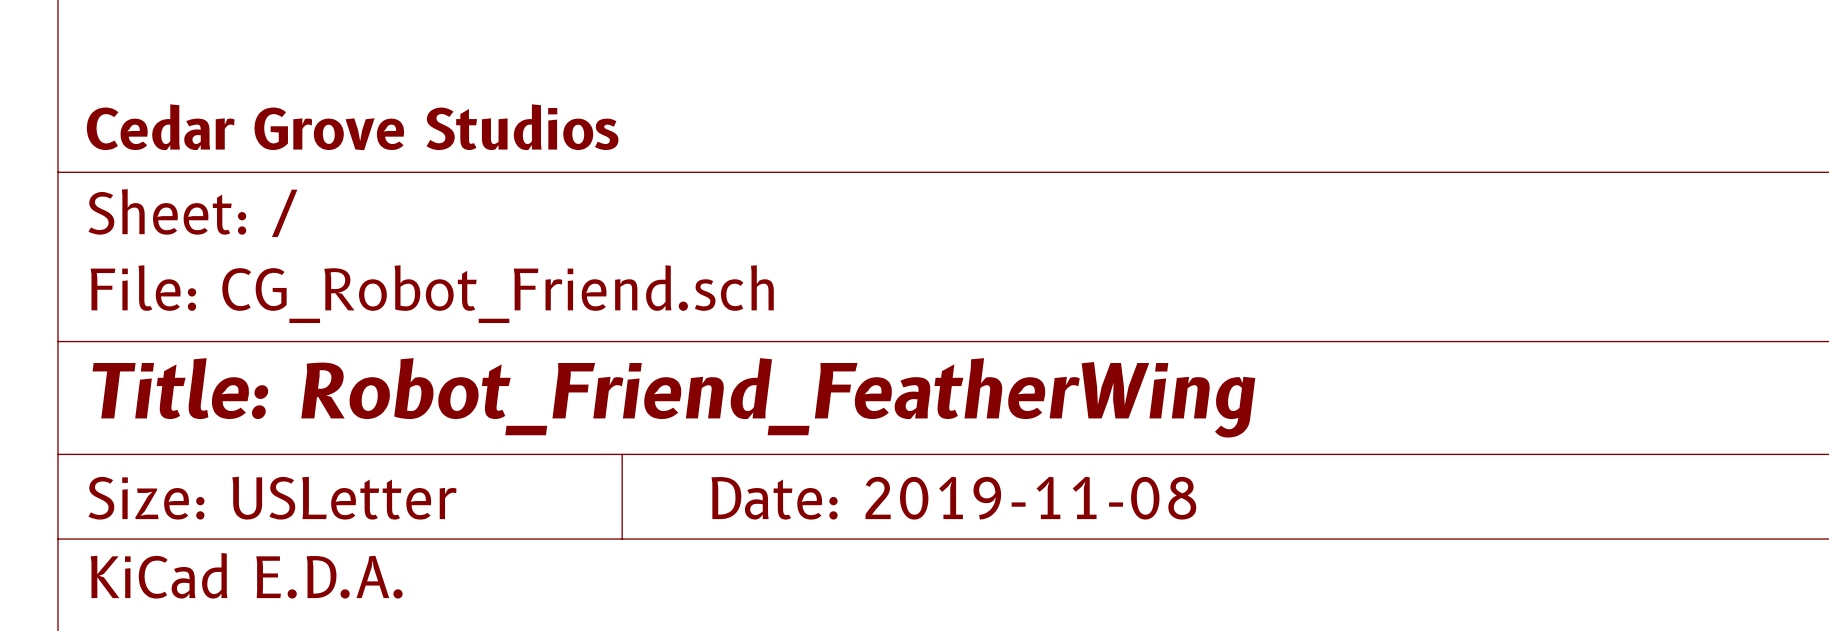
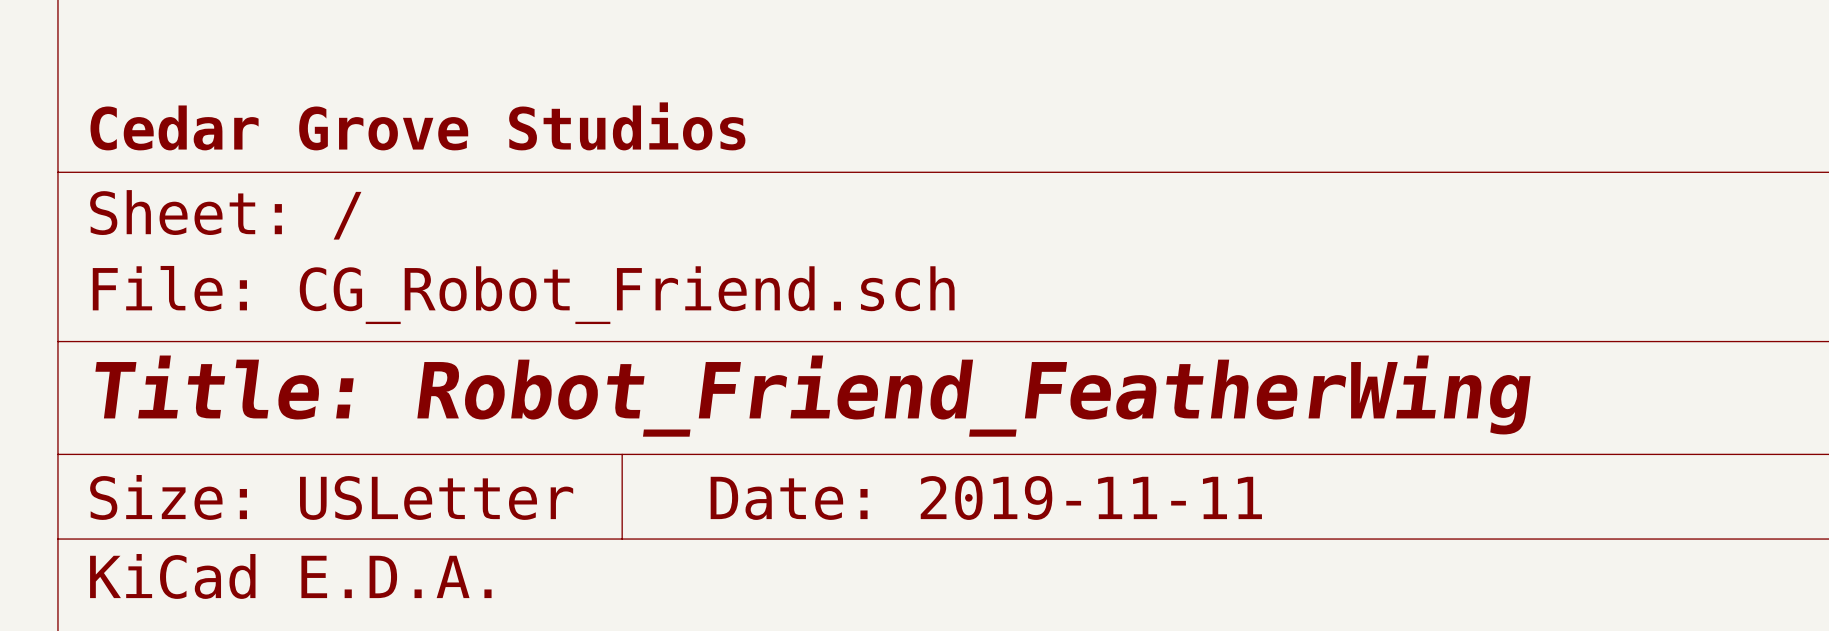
title block: Date: 2019-11-08 (953, 498) -> Date: 2019-11-11 (986, 497)

